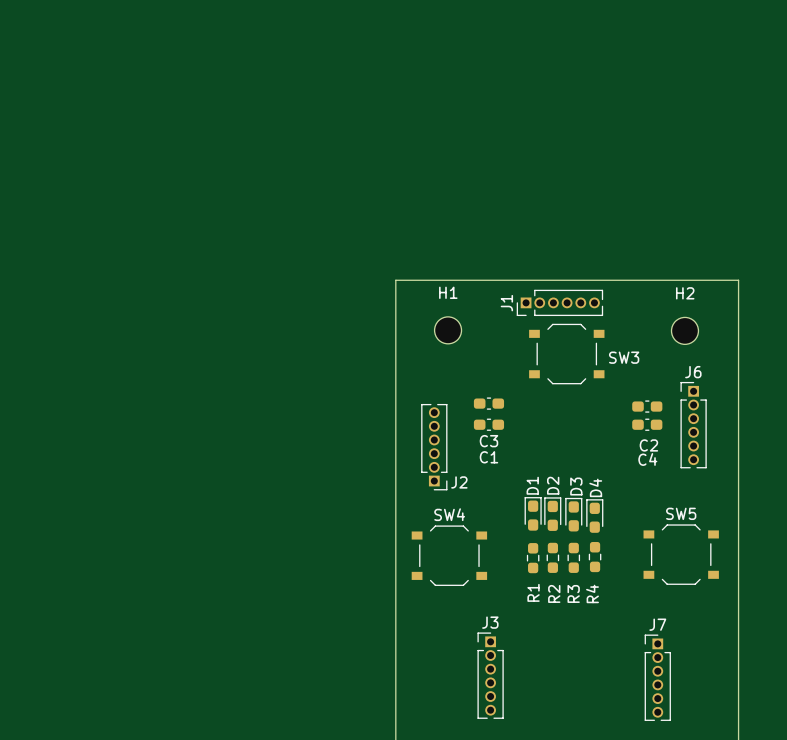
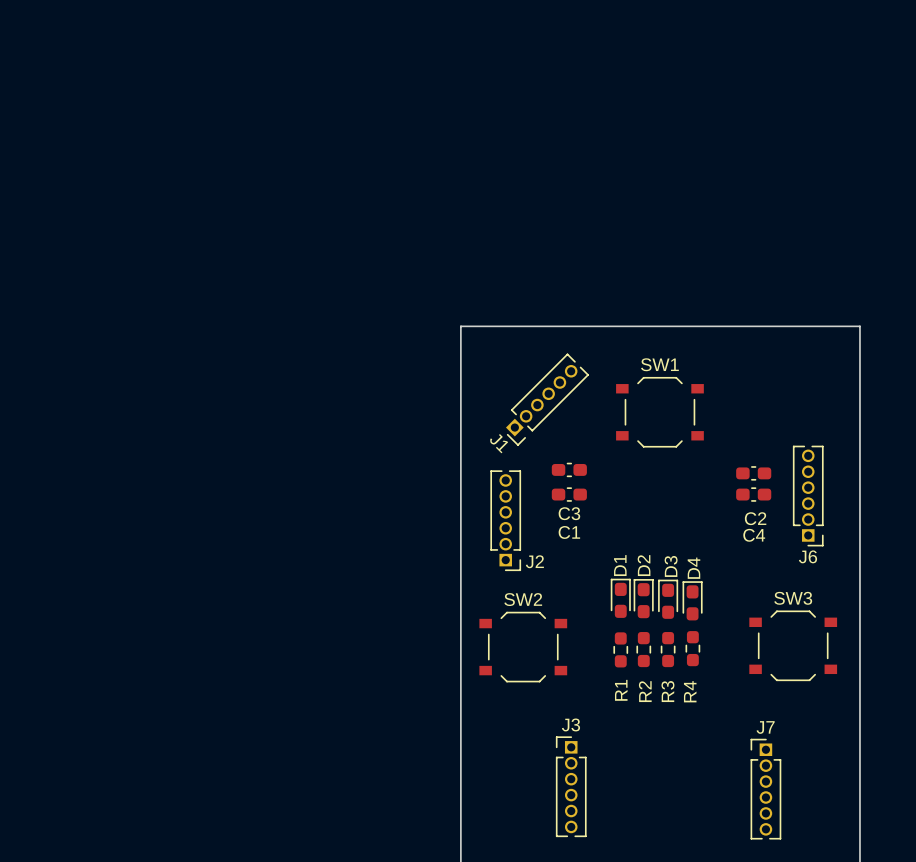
J1 rotation: 0° (559, 302) -> 45° counterclockwise (547, 399)
J1 position: (559, 302) -> (547, 399)
H1: (448, 330) -> none
H2: (684, 330) -> none
SW3 name: SW3 (624, 357) -> SW1 (659, 364)
J6 rotation: 0° (693, 425) -> 180° (808, 496)
SW5 name: SW5 (681, 513) -> SW3 (793, 598)
SW4 name: SW4 (449, 514) -> SW2 (523, 599)

